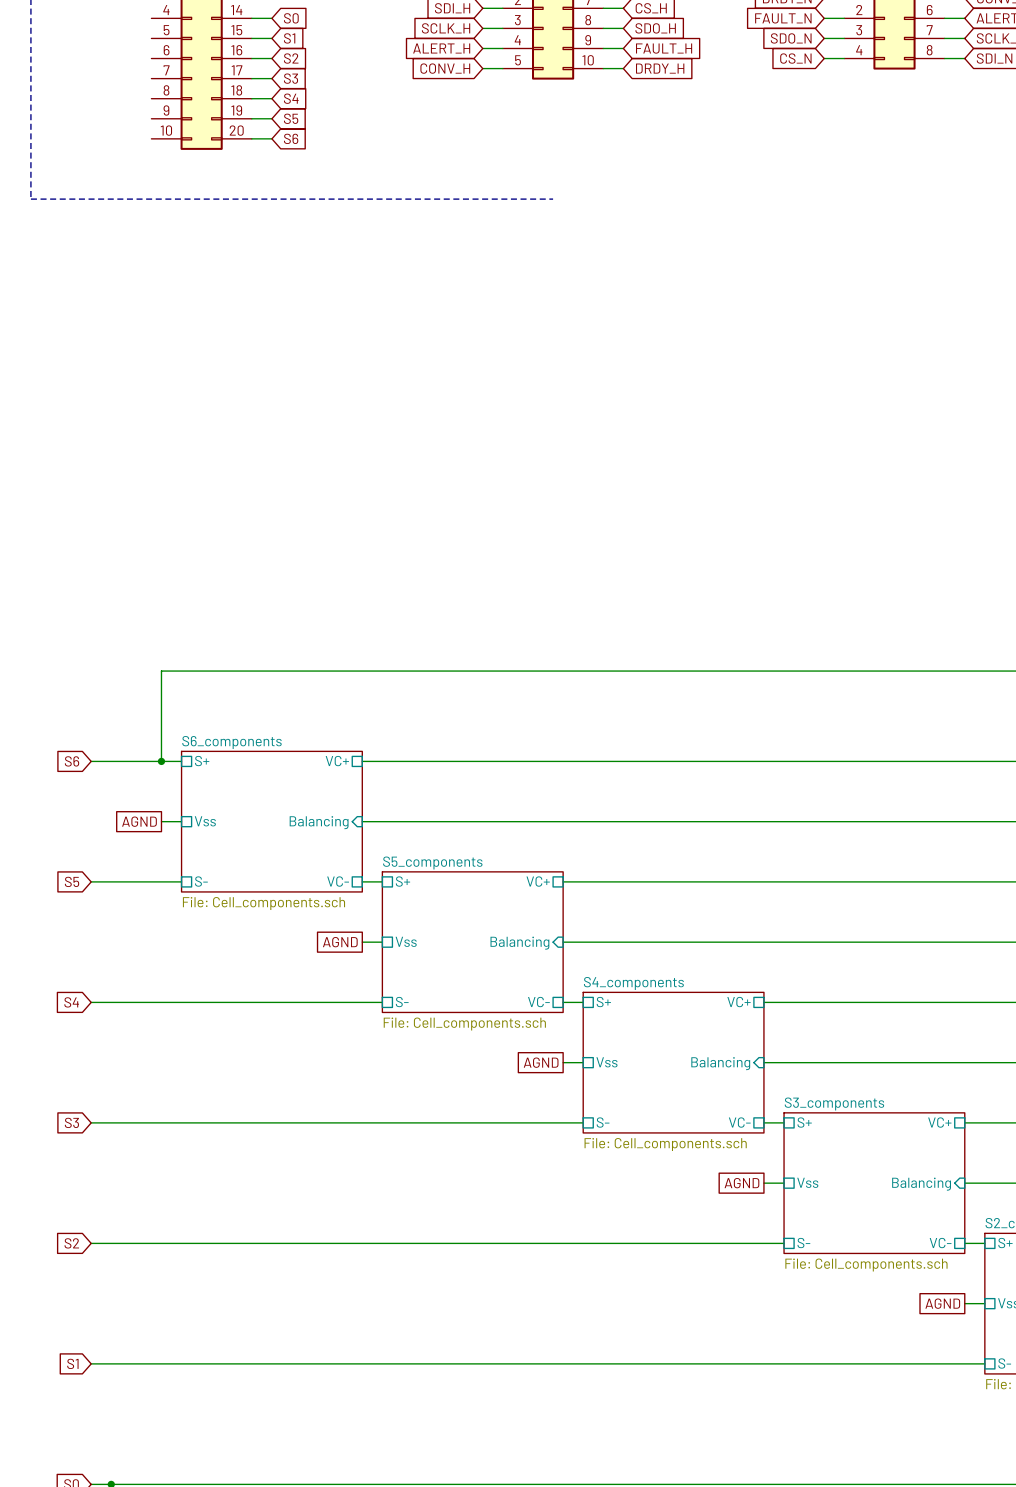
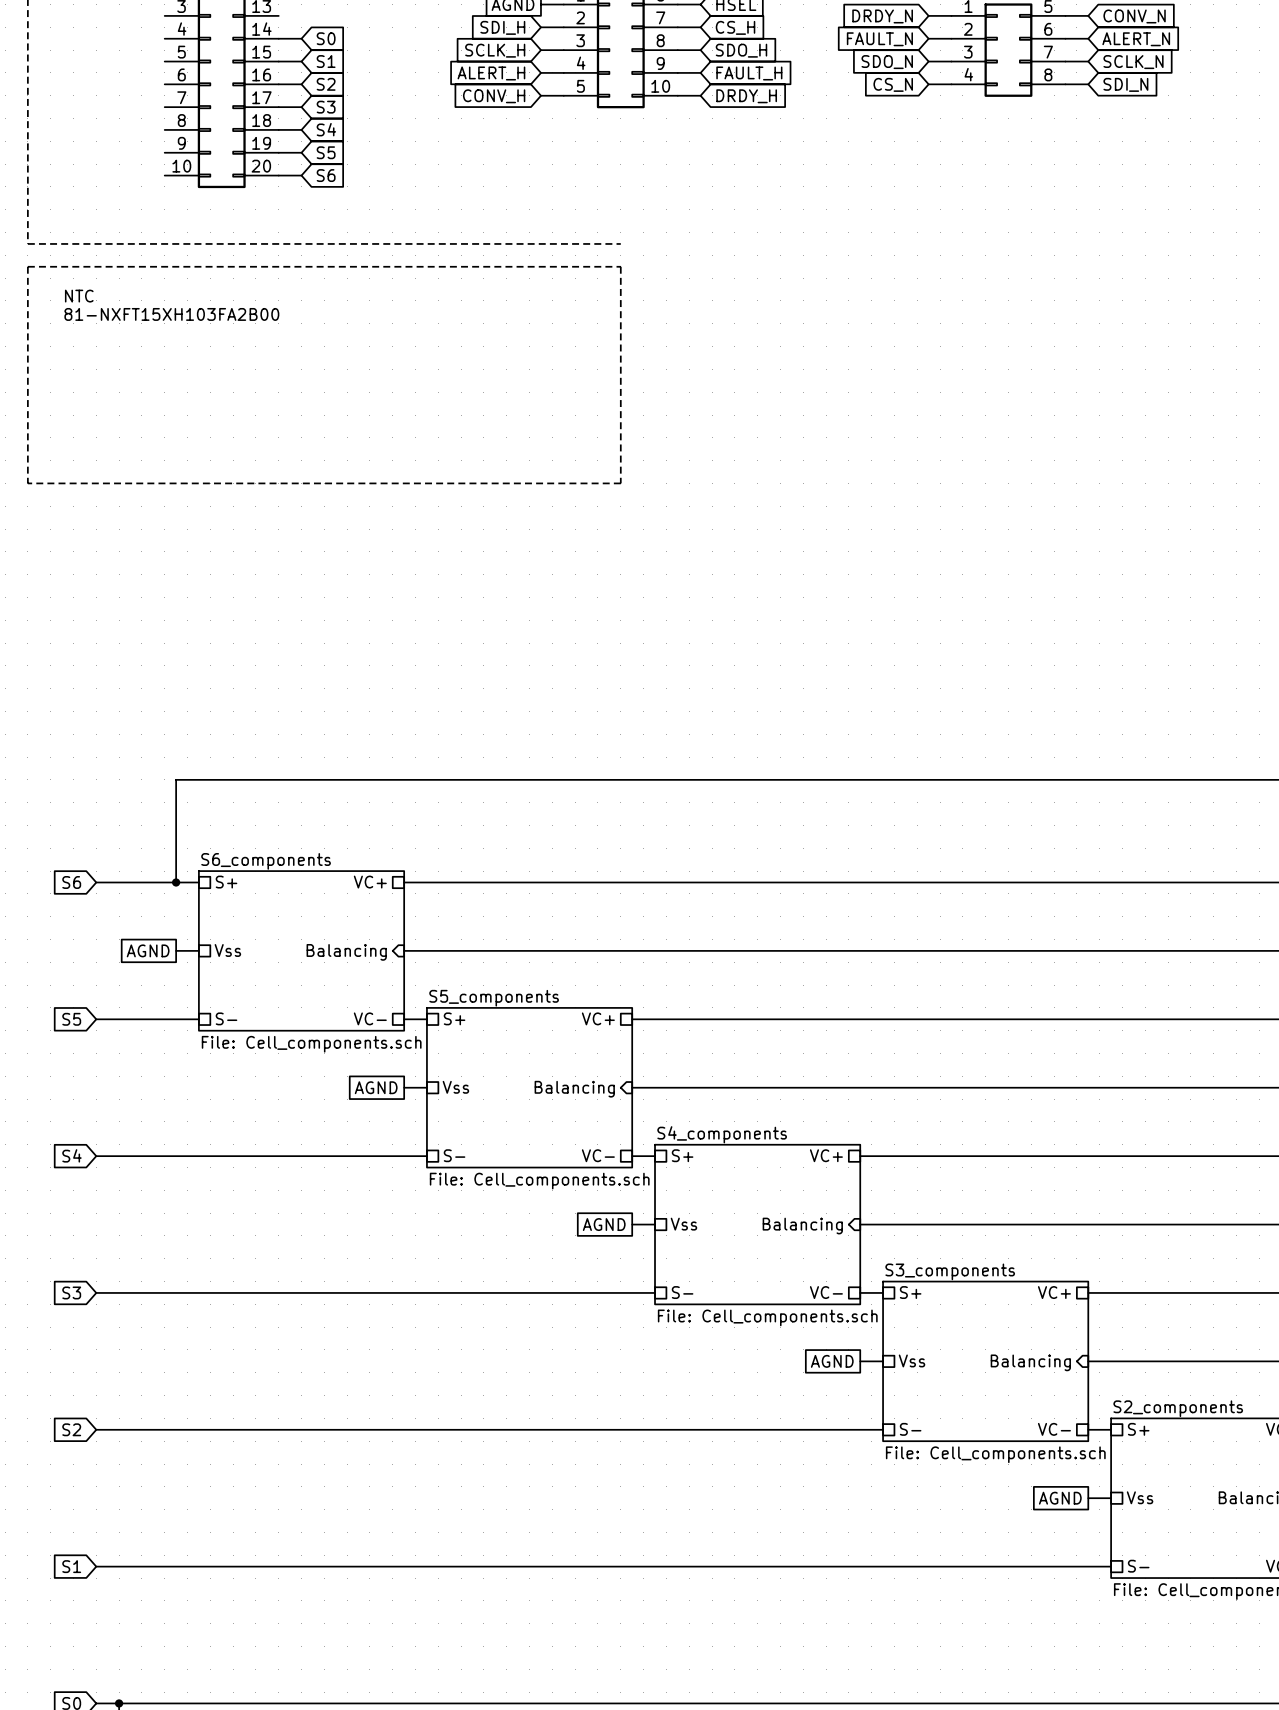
line: none -> (27, 266) (27, 483) (620, 483) (620, 266) (27, 266)
text: none -> NTC (79, 296)
text: none -> 81-NXFT15XH103FA2B00 (171, 314)

